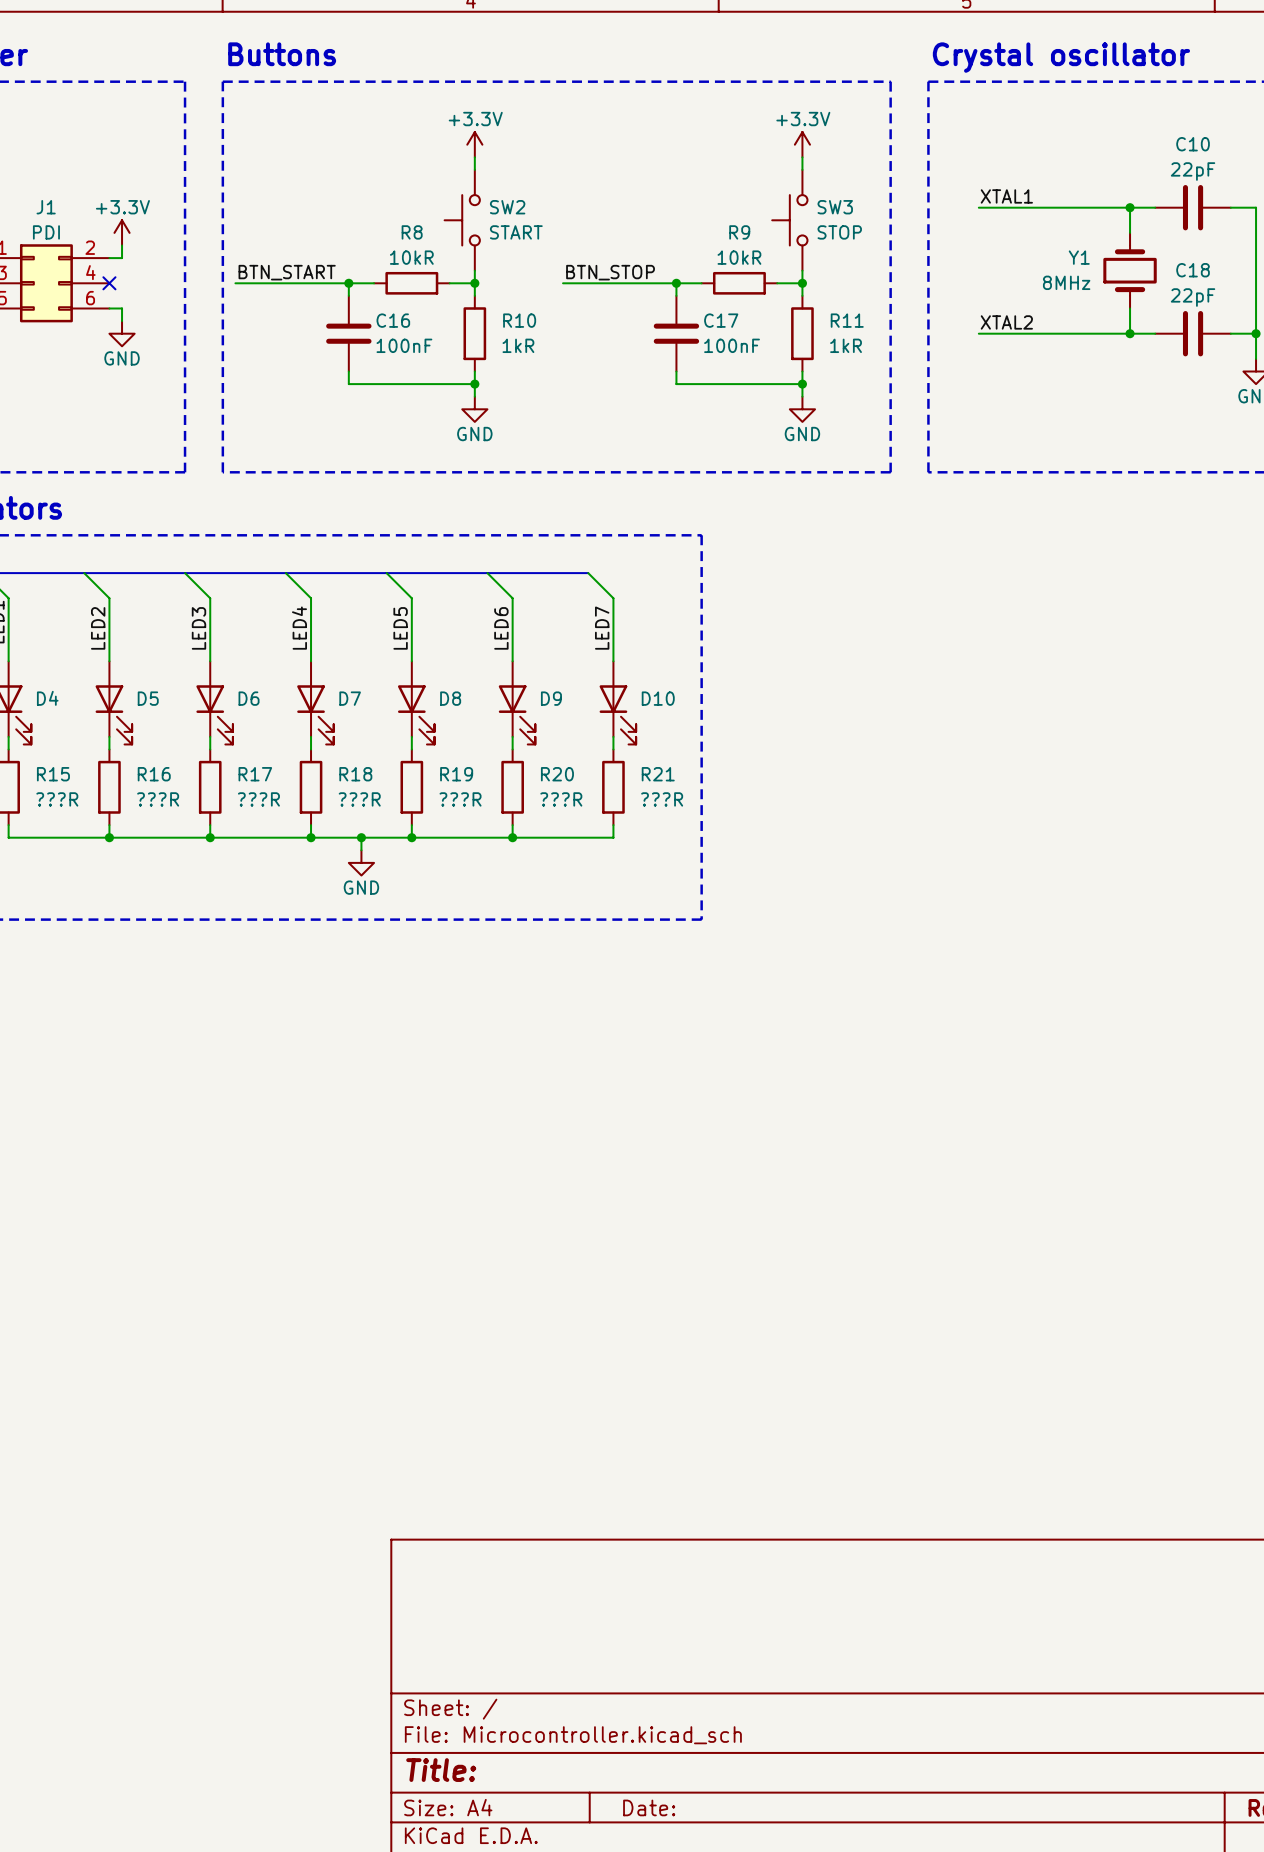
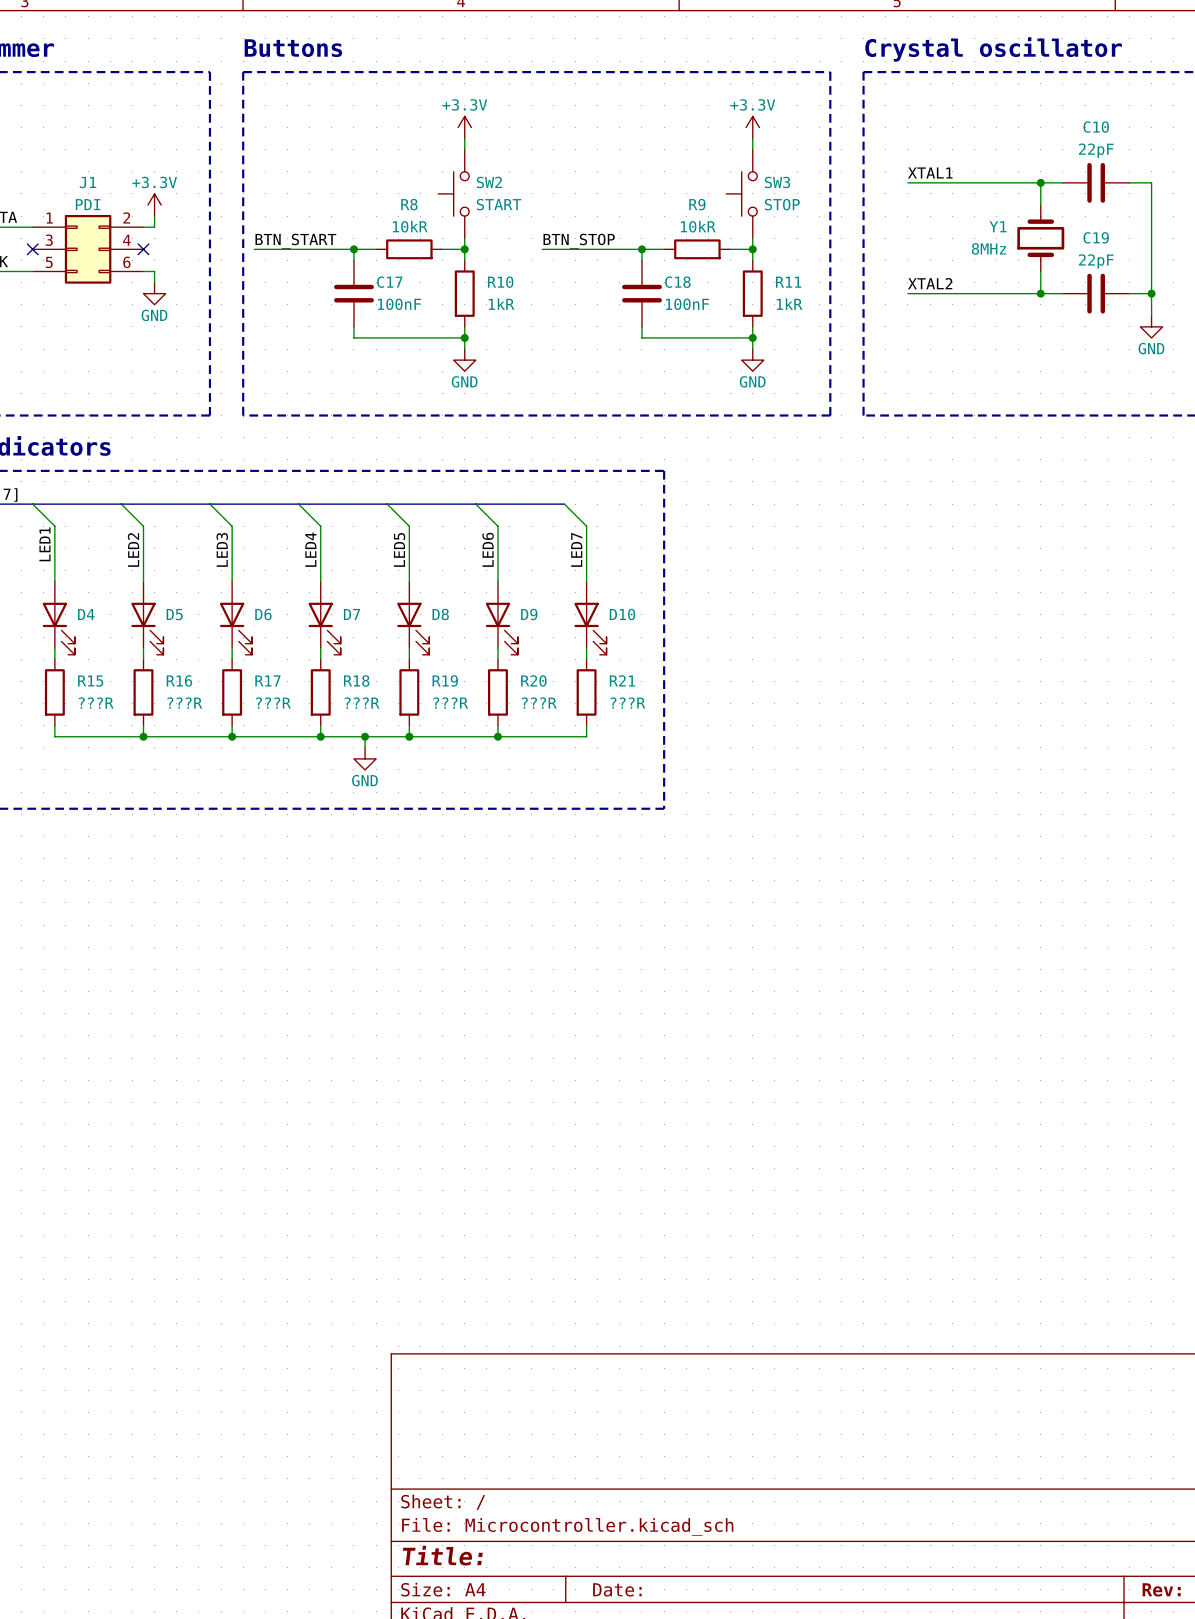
C18 name: C18 (1193, 270) -> C19 (1096, 237)
C16 name: C16 (393, 320) -> C17 (389, 282)
C17 name: C17 (721, 320) -> C18 (677, 282)

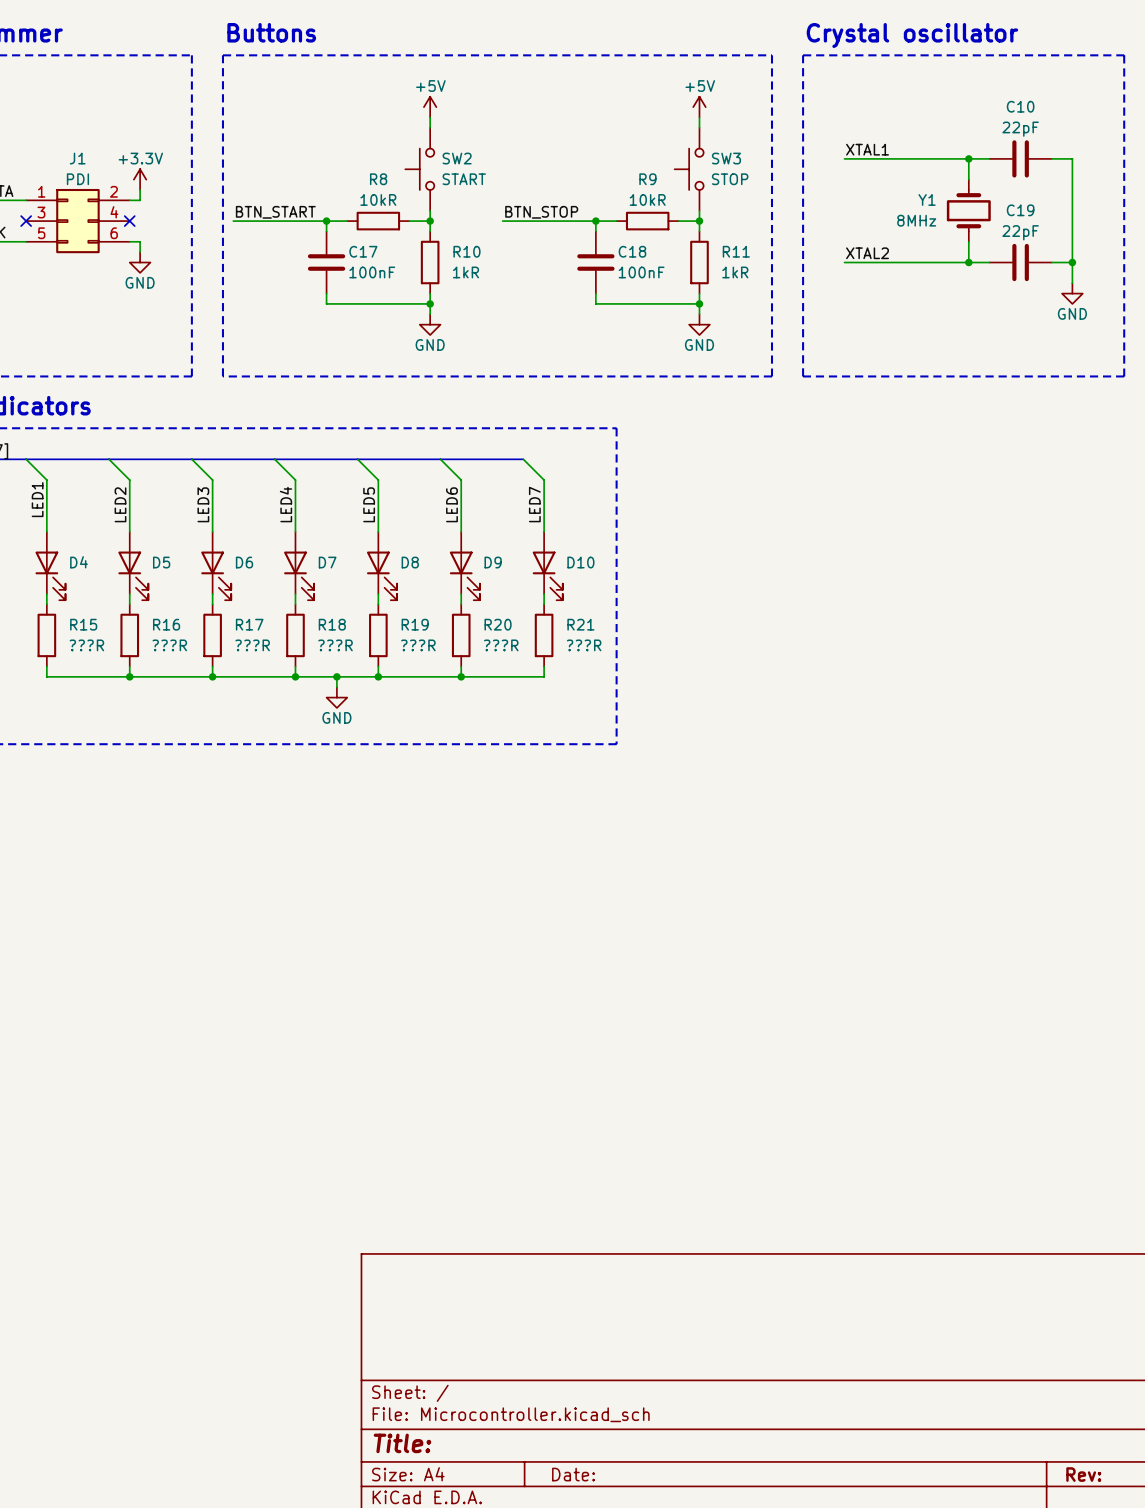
power symbol: +3.3V (464, 127) -> +5V (430, 107)
power symbol: +3.3V (752, 127) -> +5V (699, 107)

